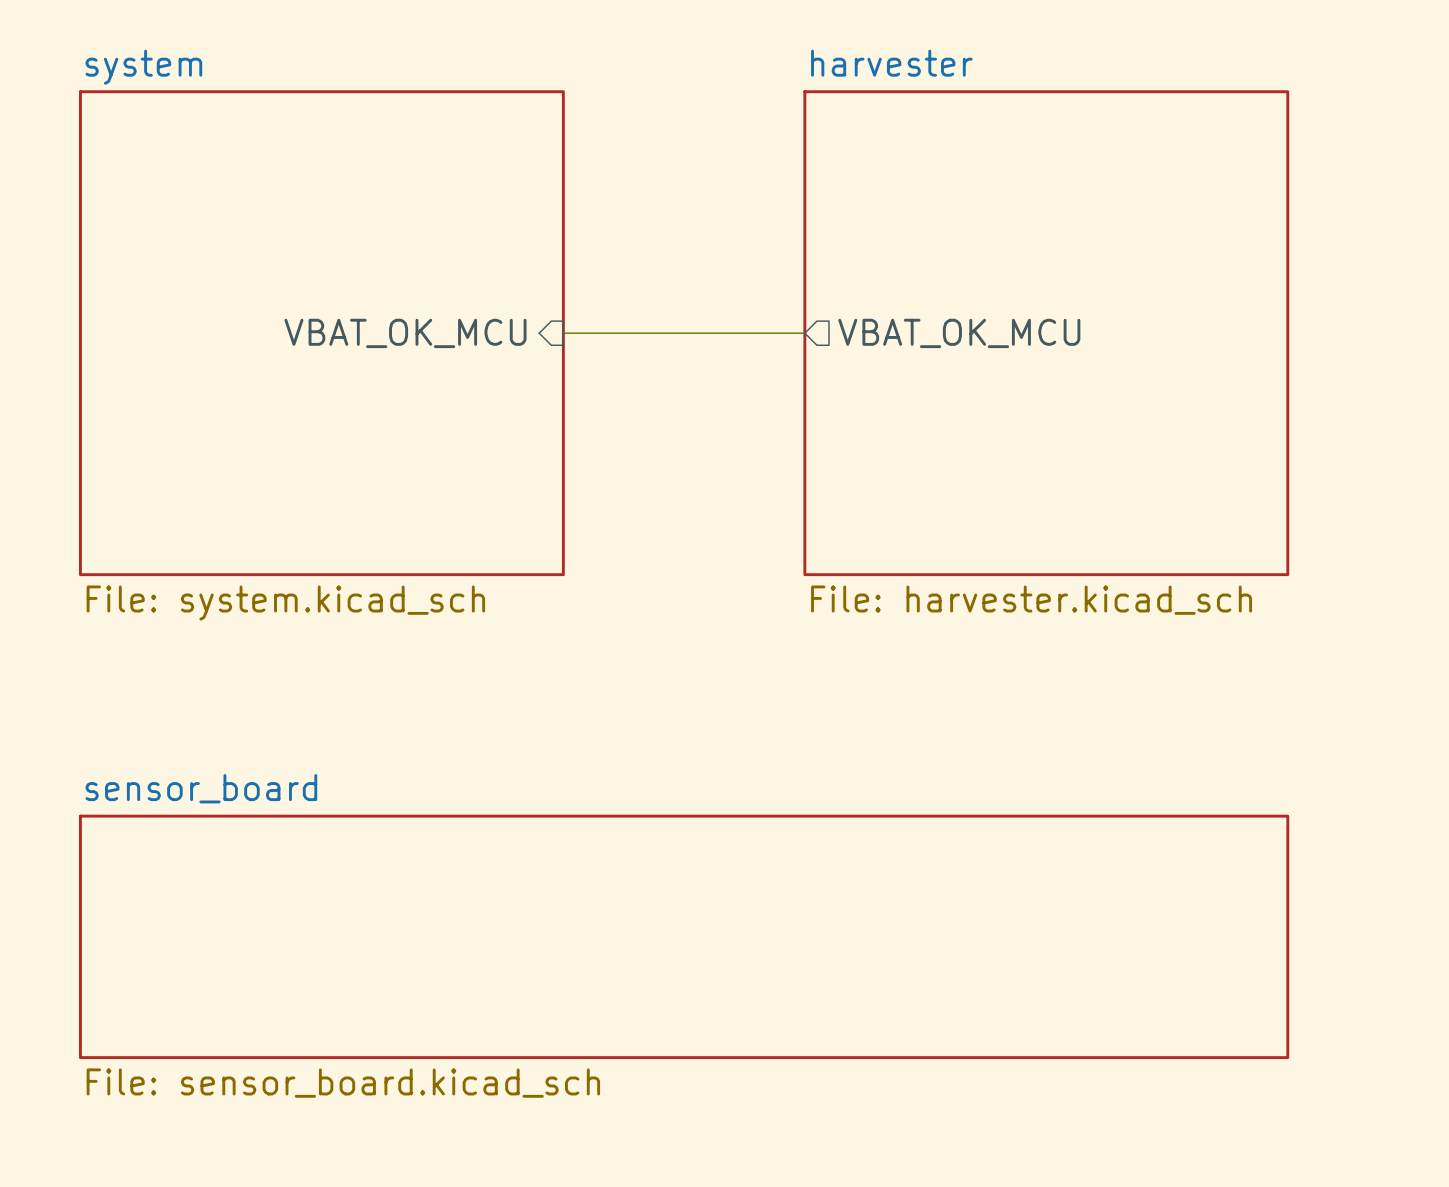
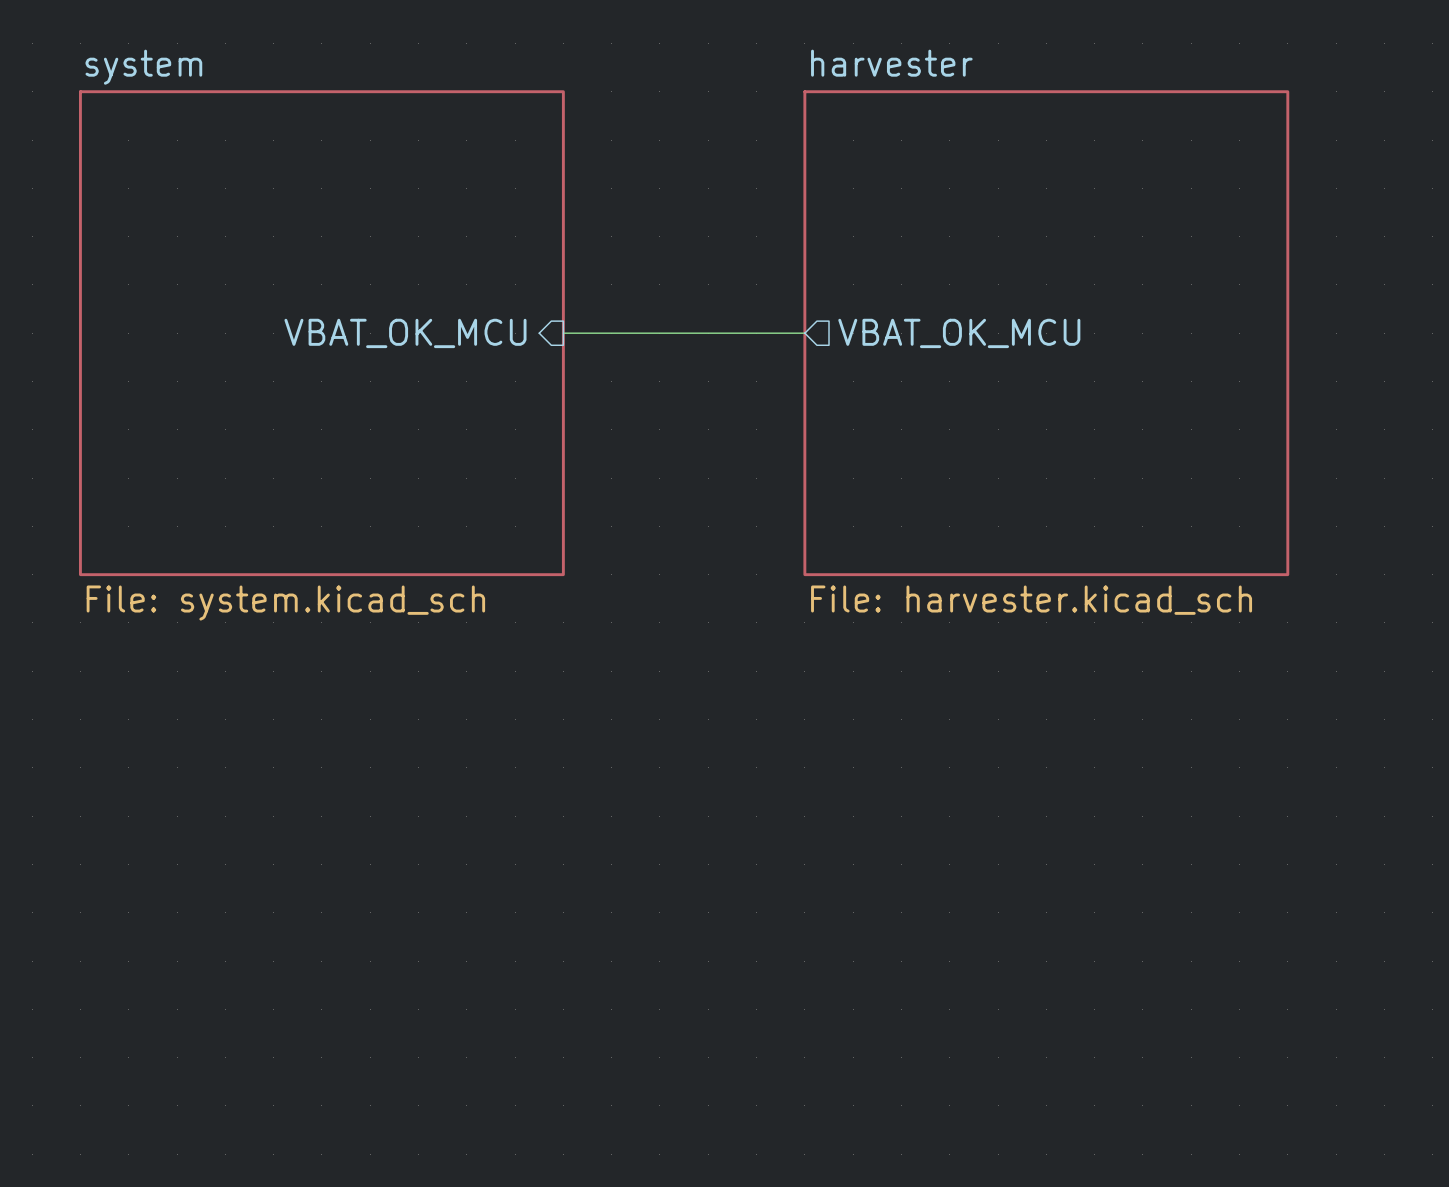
sheet sensor_board: File: sensor_board.kicad_sch (684, 936) -> none

